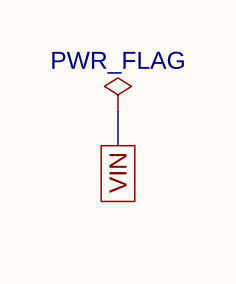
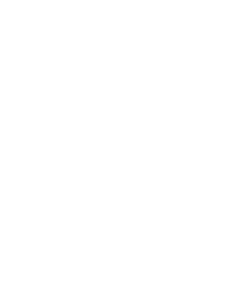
power symbol: PWR_FLAG (117, 94) -> none
wire: (117, 111) (117, 145) -> none
global label: VIN (117, 173) -> none

